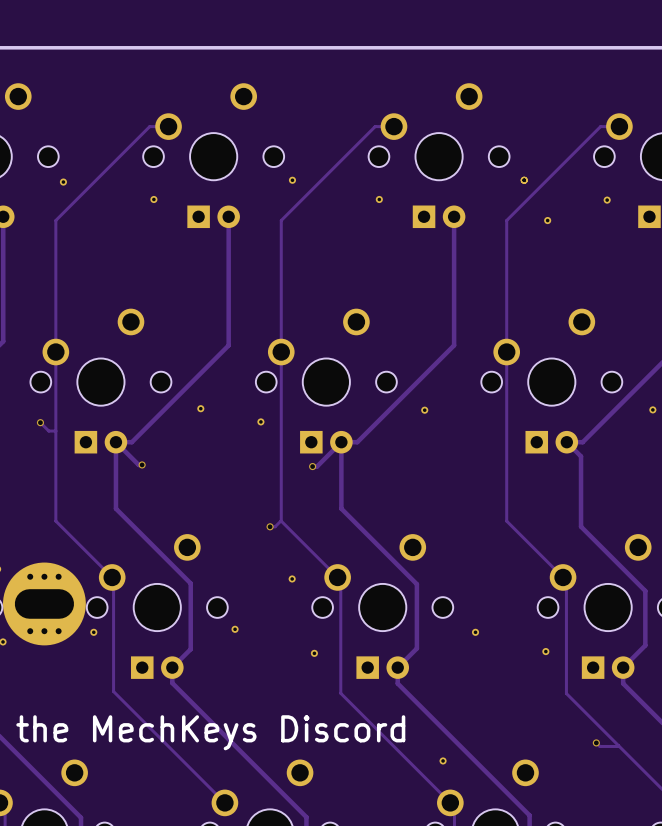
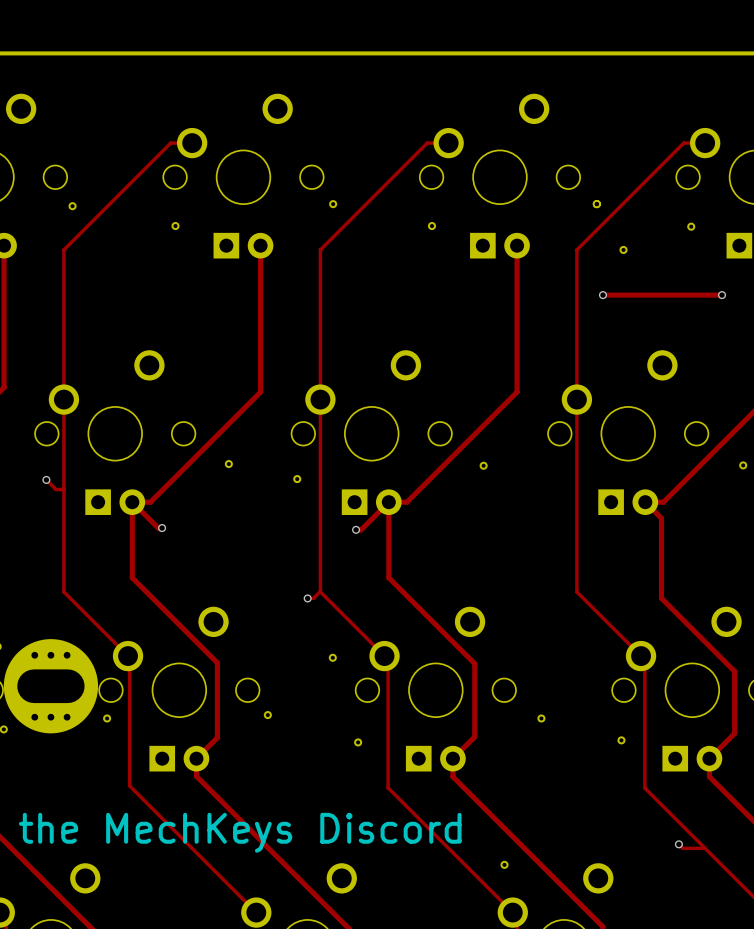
track: none -> (602, 295) (722, 295)
via: none -> (602, 295)
via: none -> (722, 295)

